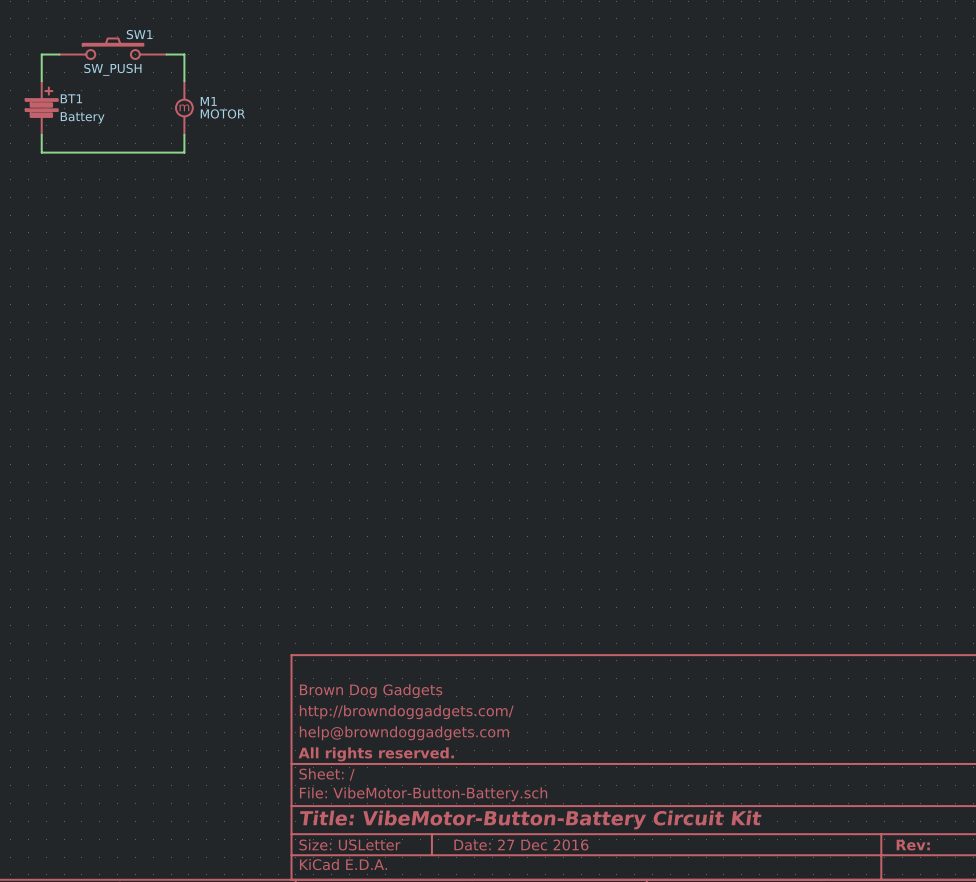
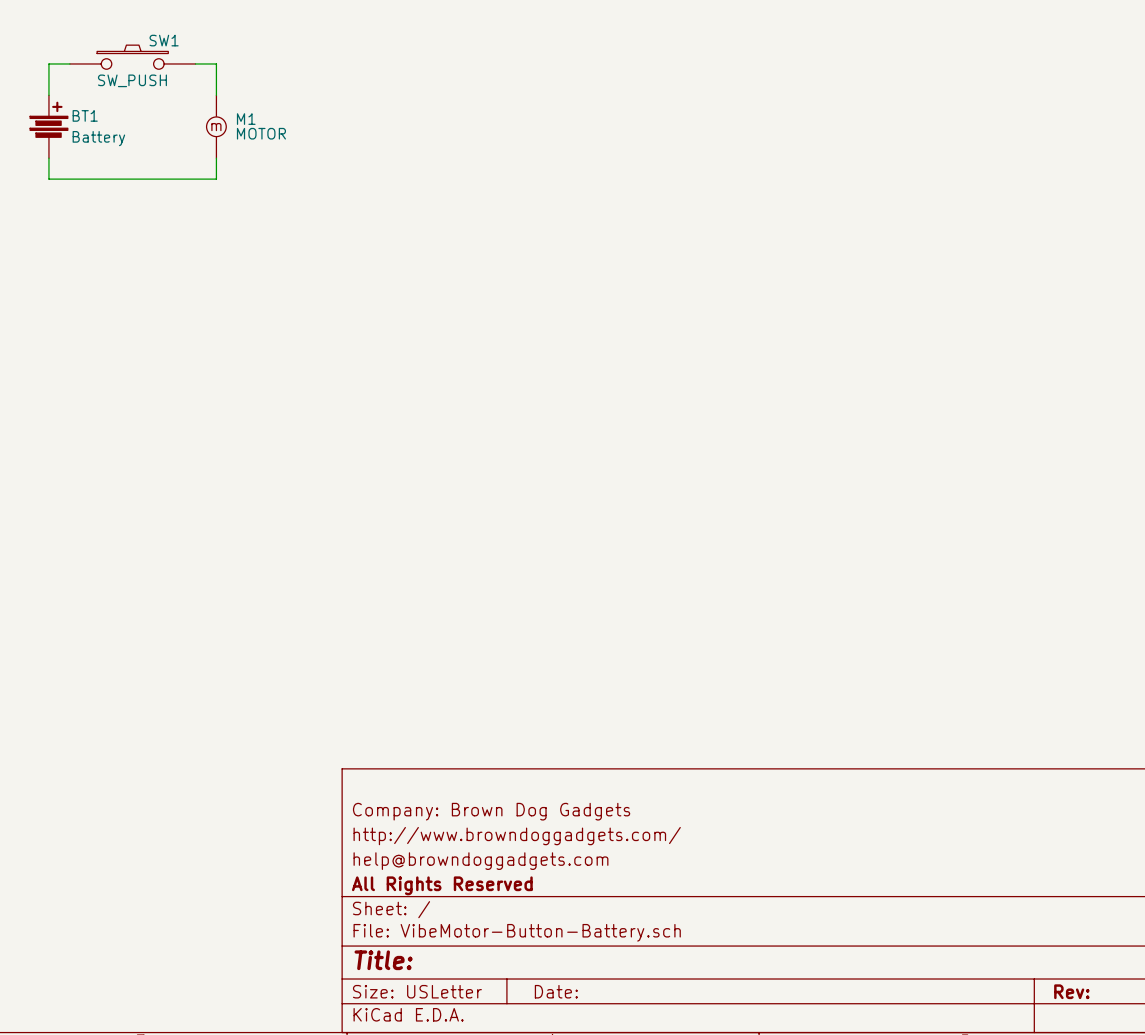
title block: Brown Dog Gadgets (371, 691) -> Company: Brown Dog Gadgets (491, 811)
title block: http://browndoggadgets.com/ (406, 712) -> http://www.browndoggadgets.com/ (517, 836)
title block: All rights reserved. (376, 754) -> All Rights Reserved (442, 885)
title block: Title: VibeMotor-Button-Battery Circuit Kit (530, 819) -> Title: (383, 960)
title block: Date: 27 Dec 2016 (521, 845) -> Date: (556, 991)

